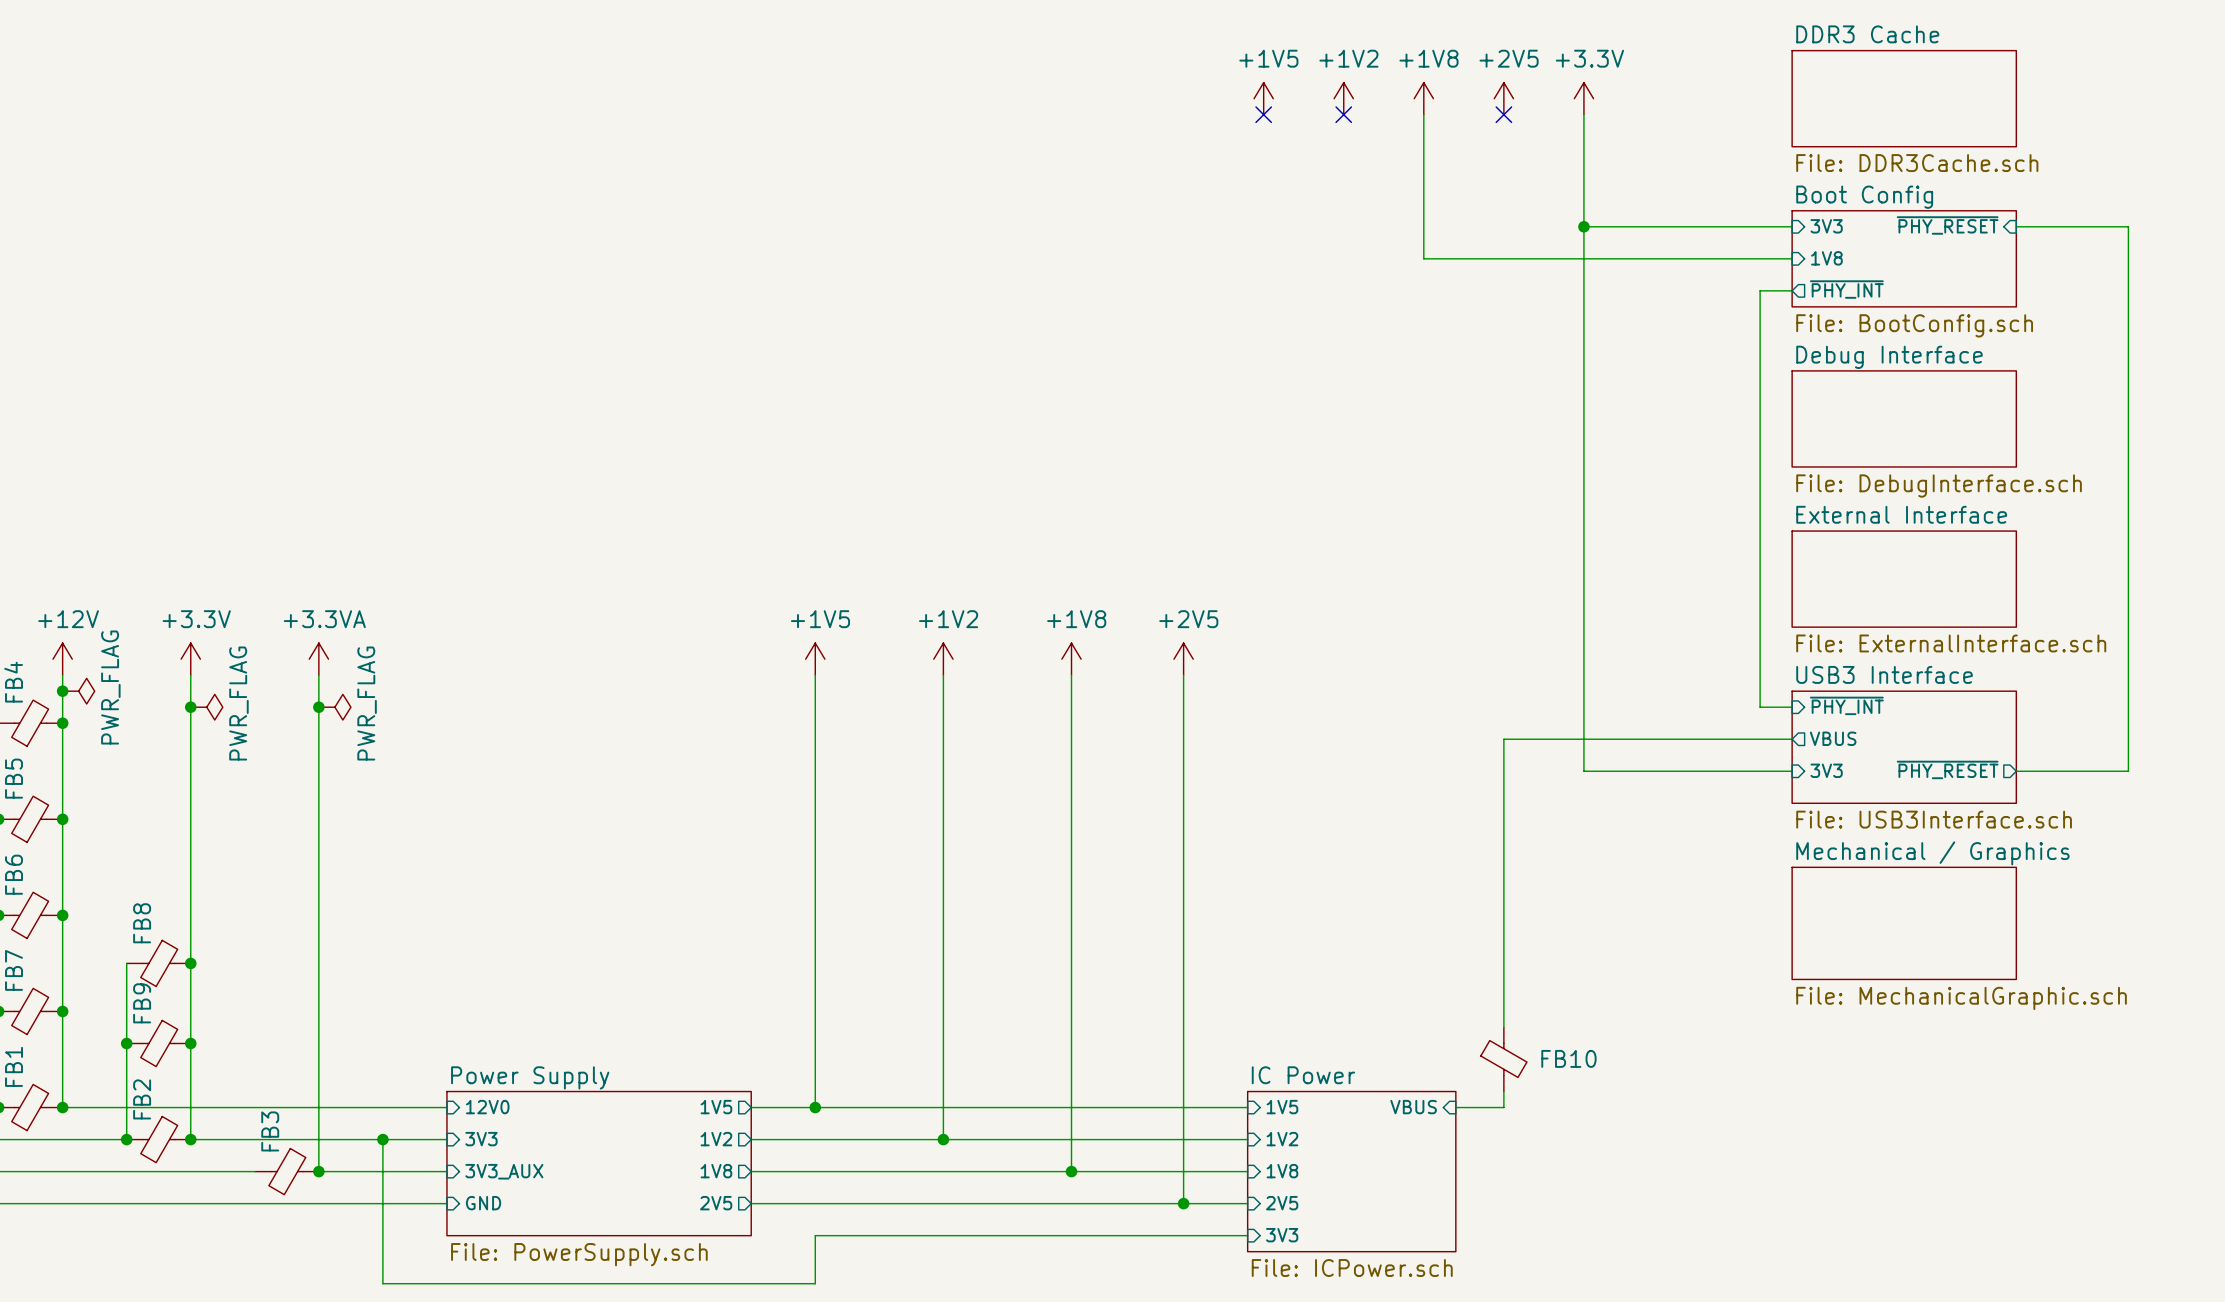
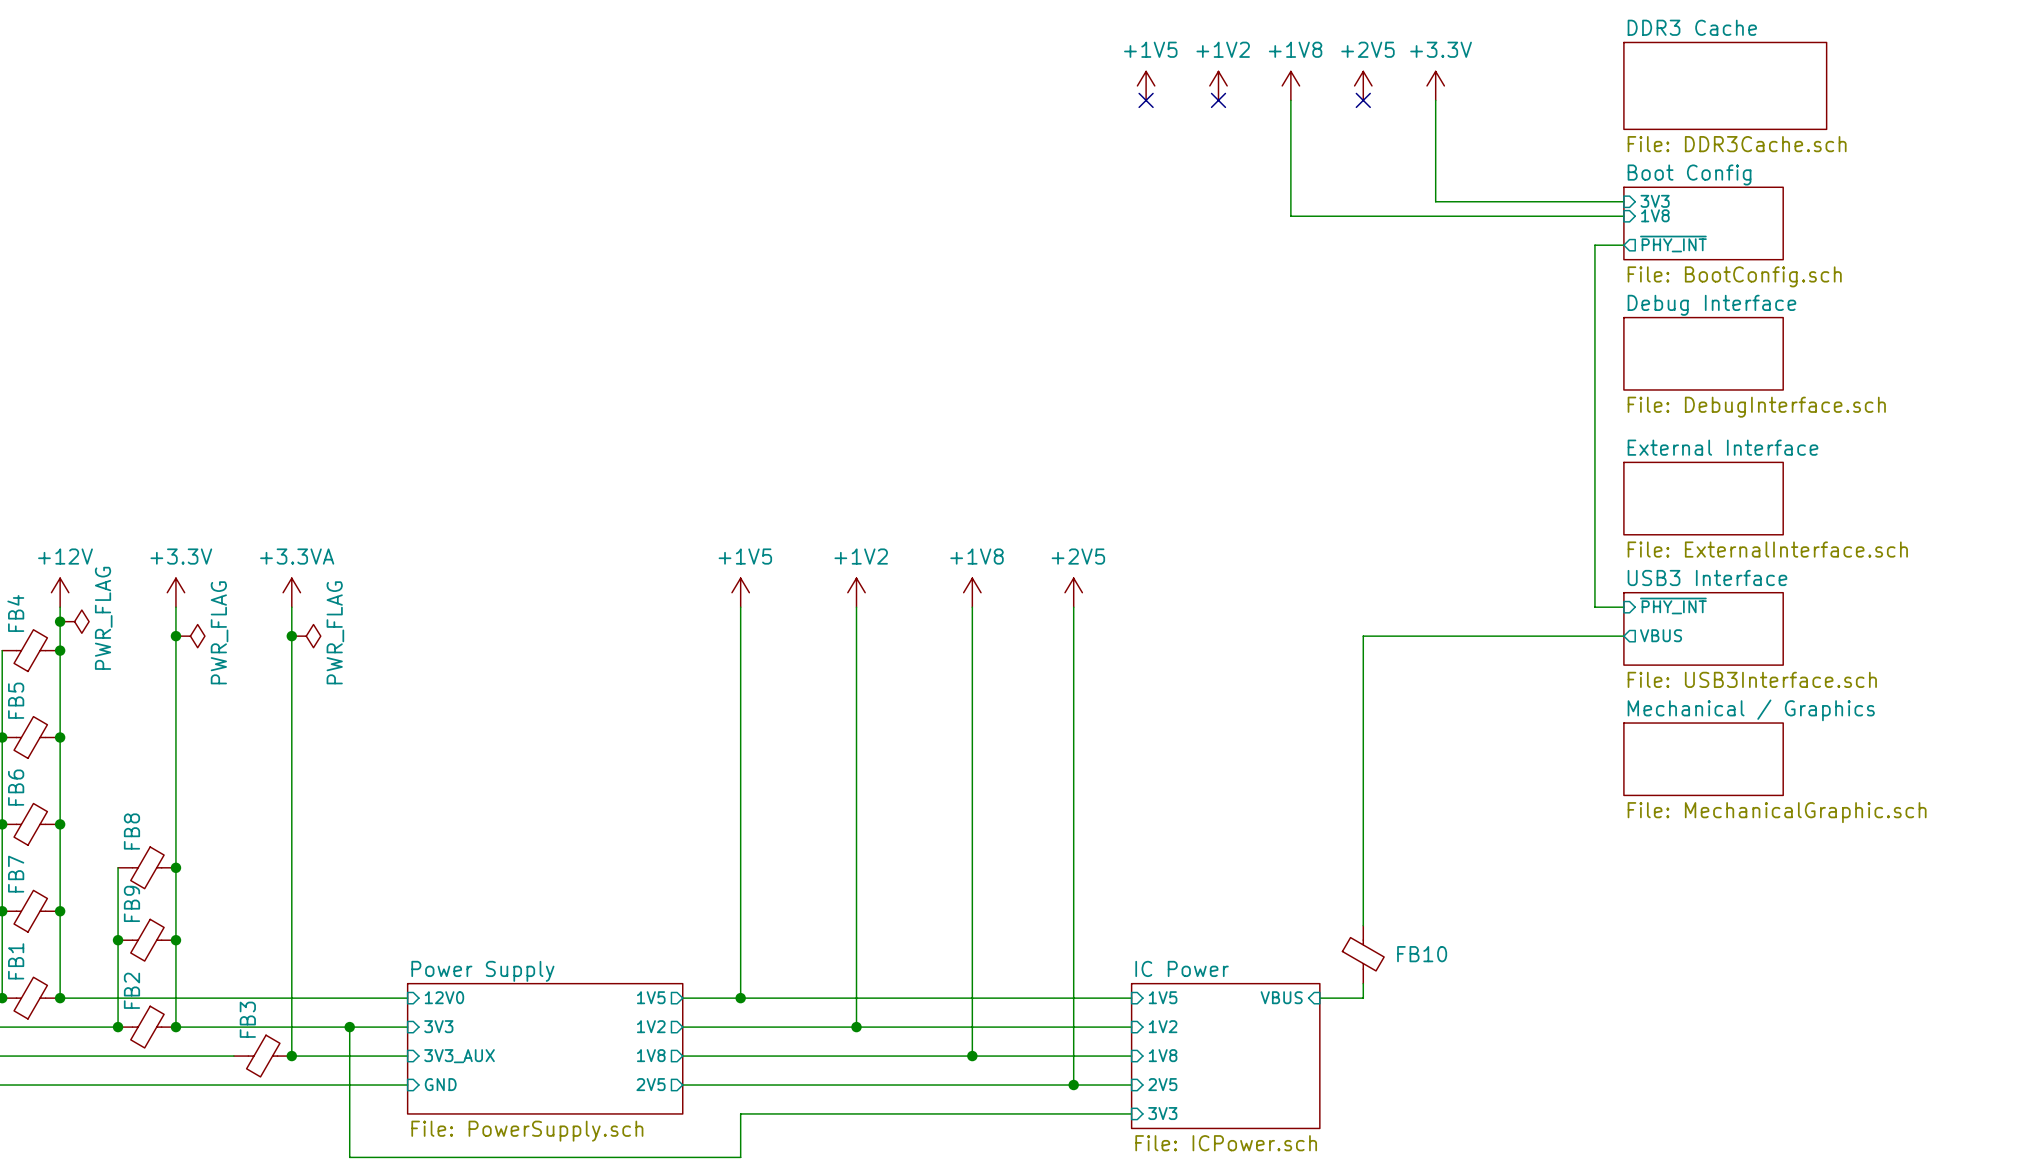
sheet pin: ~{PHY_RESET} (1947, 225) -> none
wire: (1583, 226) (1583, 771) (1792, 771) -> none
junction: (1583, 226) -> none
wire: (2016, 226) (2128, 226) (2128, 771) (2016, 771) -> none
wire: (1423, 242) (1423, 258) (1792, 258) -> (1290, 216) (1623, 216)
sheet Boot Config: none -> File: BootConfig.sch (1703, 223)
sheet pin position: 1V8 (1826, 258) -> 1V8 (1655, 215)
sheet Boot Config: File: BootConfig.sch (1904, 258) -> none
sheet pin position: ~{PHY_INT} (1846, 289) -> ~{PHY_INT} (1673, 244)
wire: (1760, 290) (1792, 290) -> (1594, 259) (1594, 245) (1623, 245)
sheet Debug Interface: none -> File: DebugInterface.sch (1703, 353)
sheet Debug Interface: File: DebugInterface.sch (1904, 418) -> none
sheet External Interface: none -> File: ExternalInterface.sch (1703, 498)
sheet External Interface: File: ExternalInterface.sch (1904, 579) -> none
sheet pin: none -> ~{PHY_INT} (1673, 606)
sheet USB3 Interface name position: USB3 Interface (1884, 674) -> USB3 Interface (1707, 577)
wire: (1760, 675) (1760, 707) -> (1594, 607) (1623, 607)
sheet USB3 Interface shape: [1792, 691, 2017, 804] -> [1623, 592, 1784, 666]
sheet pin shape: input (1846, 705) -> output (1661, 635)
sheet pin: ~{PHY_INT} (1846, 705) -> VBUS (1661, 635)
sheet pin: VBUS (1833, 738) -> none
wire: (1503, 739) (1792, 739) -> (1363, 665) (1363, 636) (1594, 636)
sheet pin: ~{PHY_RESET} (1947, 769) -> none
sheet pin: 3V3 (1826, 770) -> none
sheet USB3 Interface value position: File: USB3Interface.sch (1934, 819) -> File: USB3Interface.sch (1752, 679)
sheet Mechanical / Graphics: none -> File: MechanicalGraphic.sch (1703, 759)
sheet Mechanical / Graphics: File: MechanicalGraphic.sch (1904, 923) -> none

